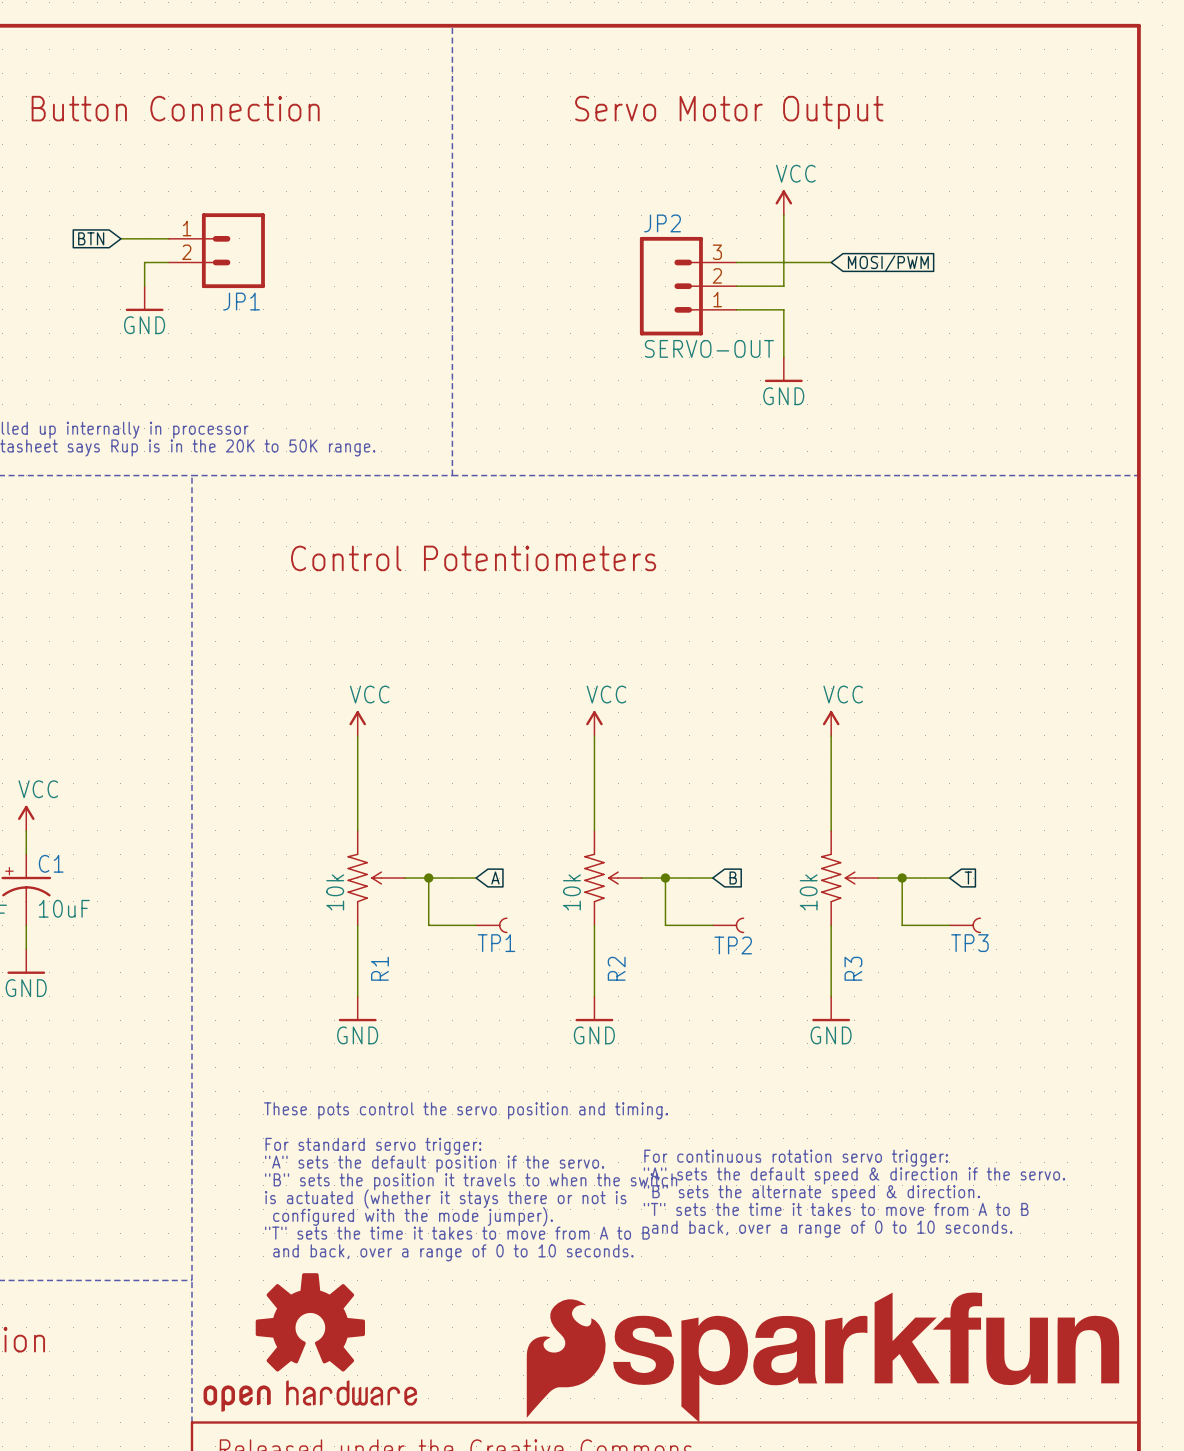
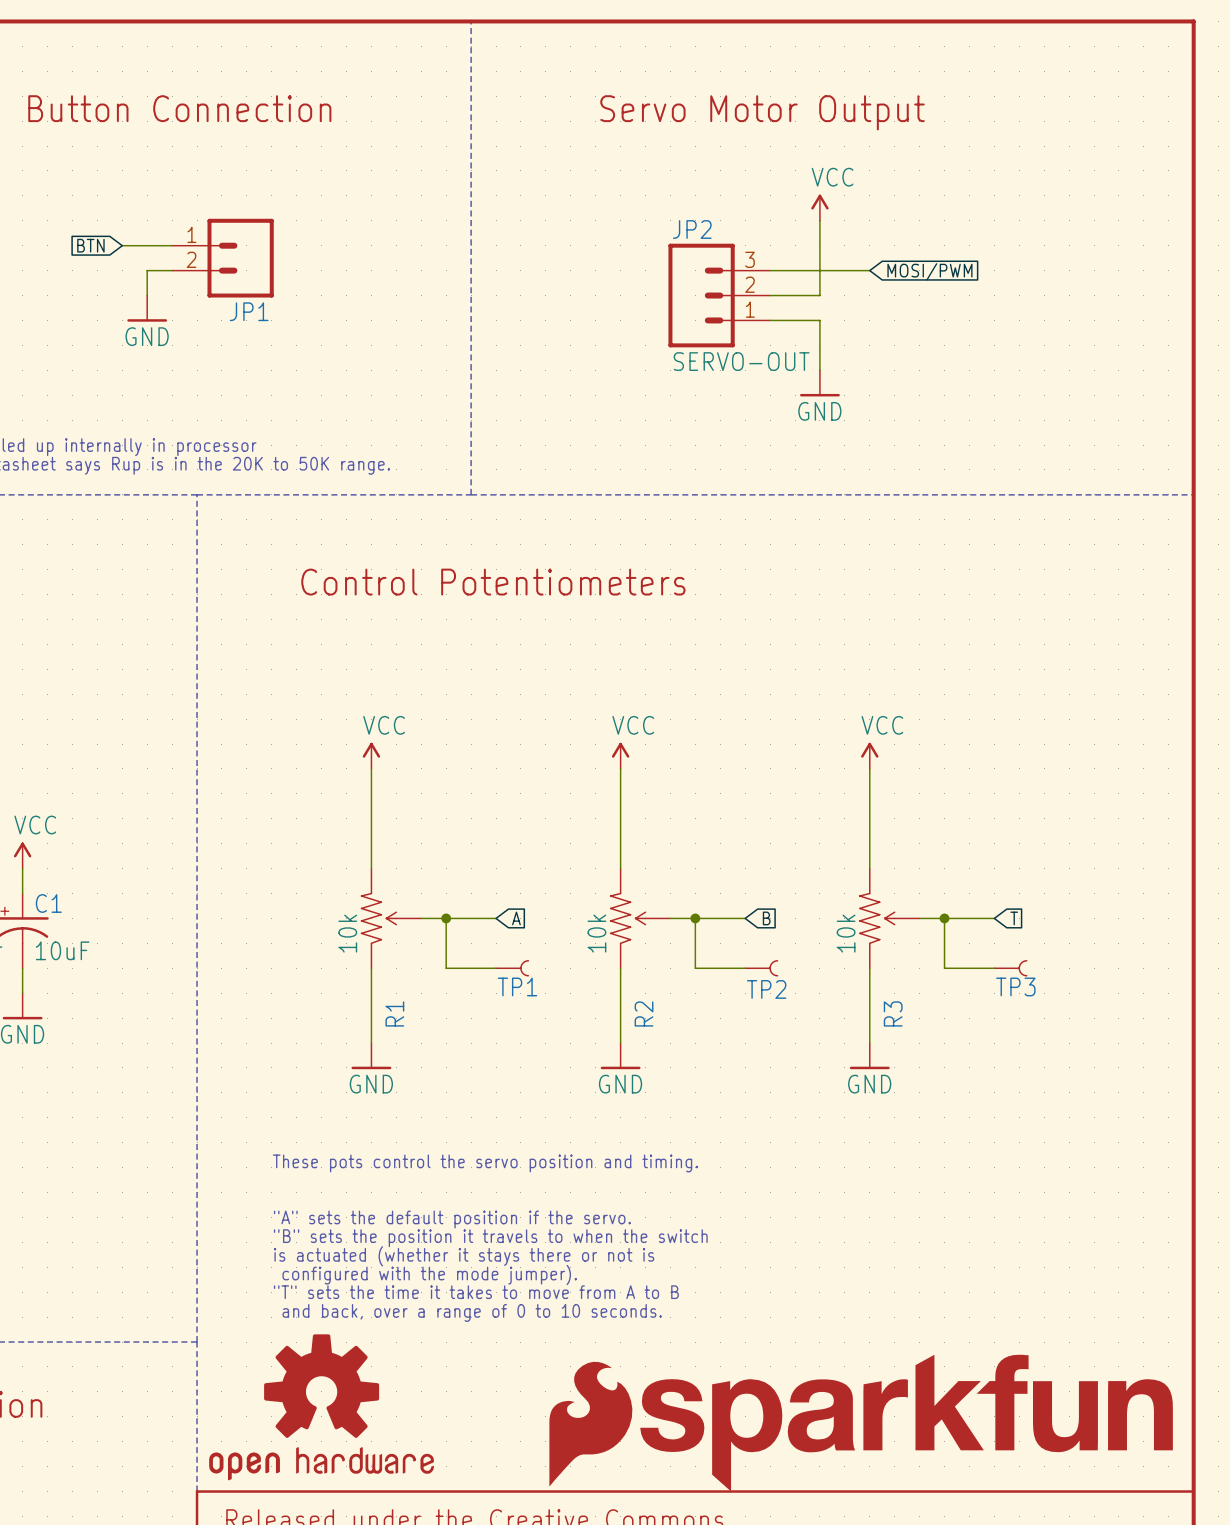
text: For standard servo trigger: (373, 1146) -> none
text: For continuous rotation servo trigger: (796, 1158) -> none
text: "A" sets the default speed & direction if the servo. (854, 1175) -> none
text: "B" sets the alternate speed & direction. (811, 1193) -> none
text: "T" sets the time it takes to move from A to B (836, 1209) -> none
text: and back, over a range of 0 to 10 seconds. (832, 1229) -> none

